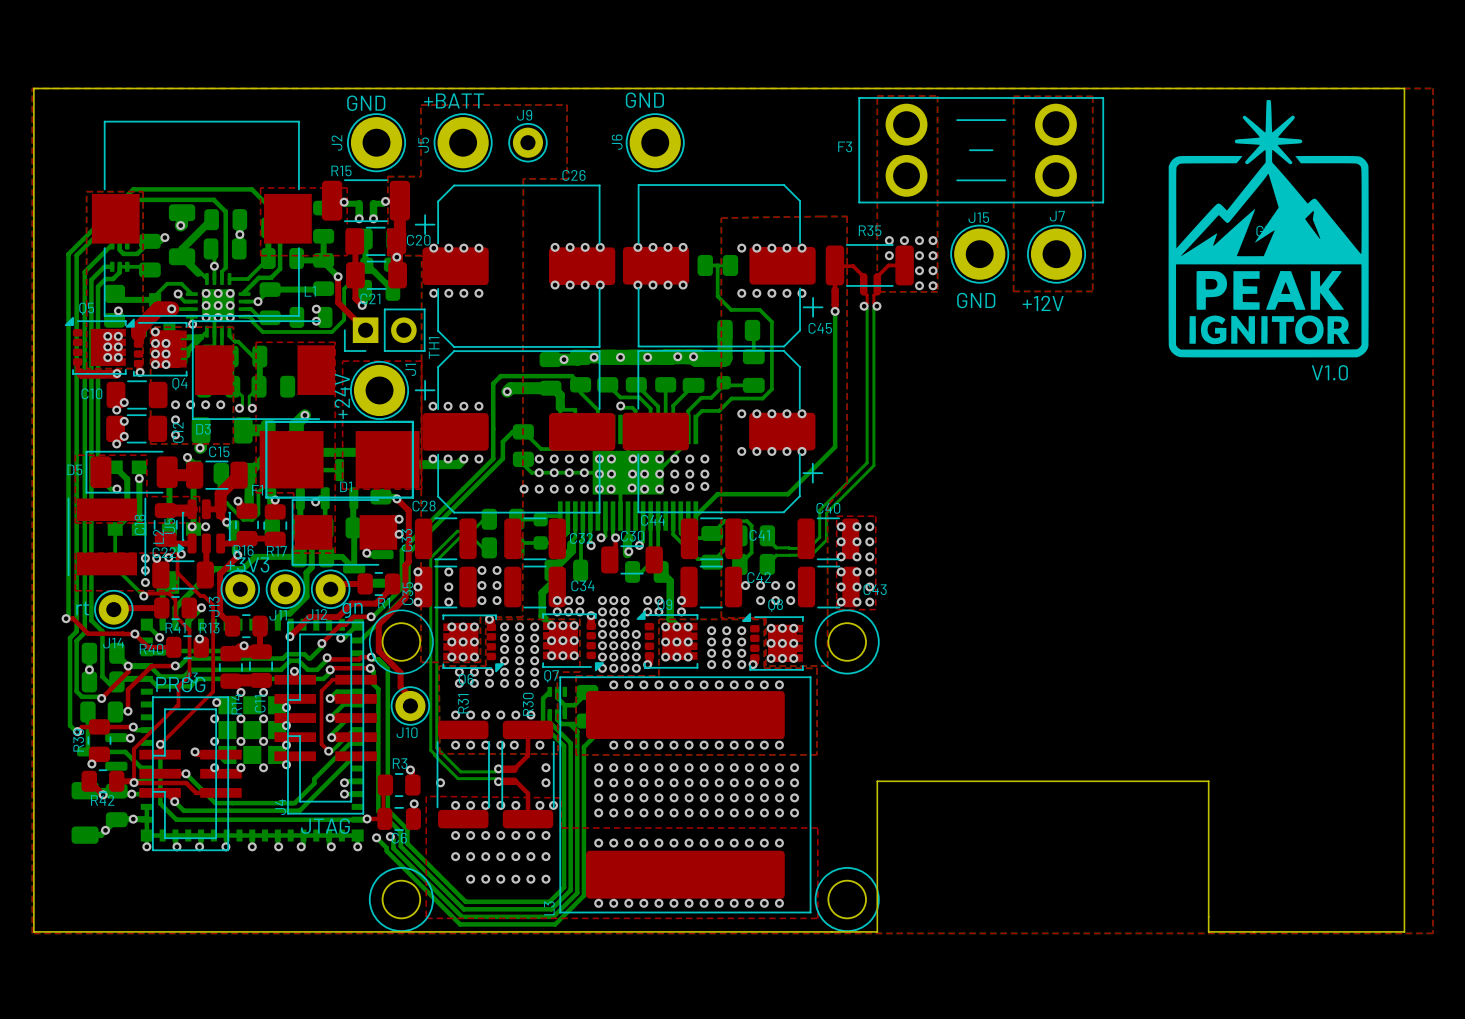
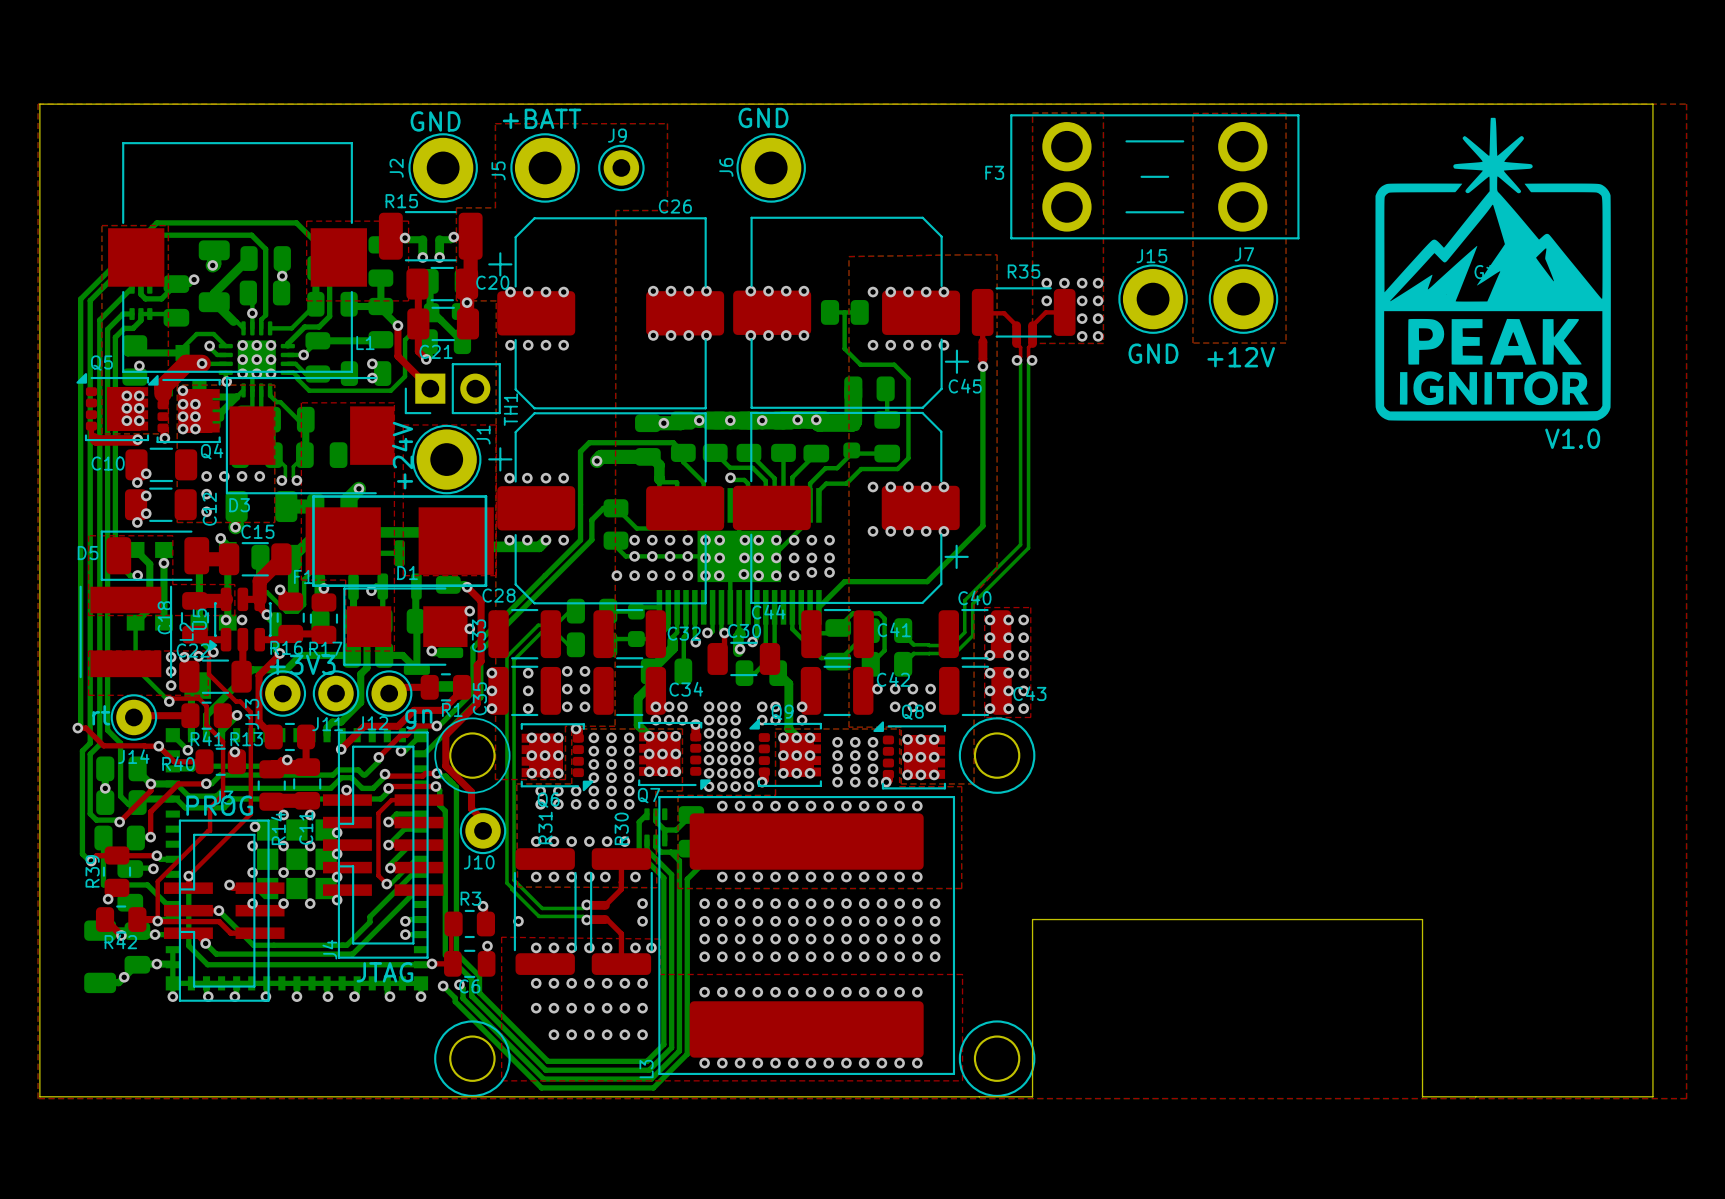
part footprint: [77, 733, 128, 771] -> [117, 860, 144, 912]

